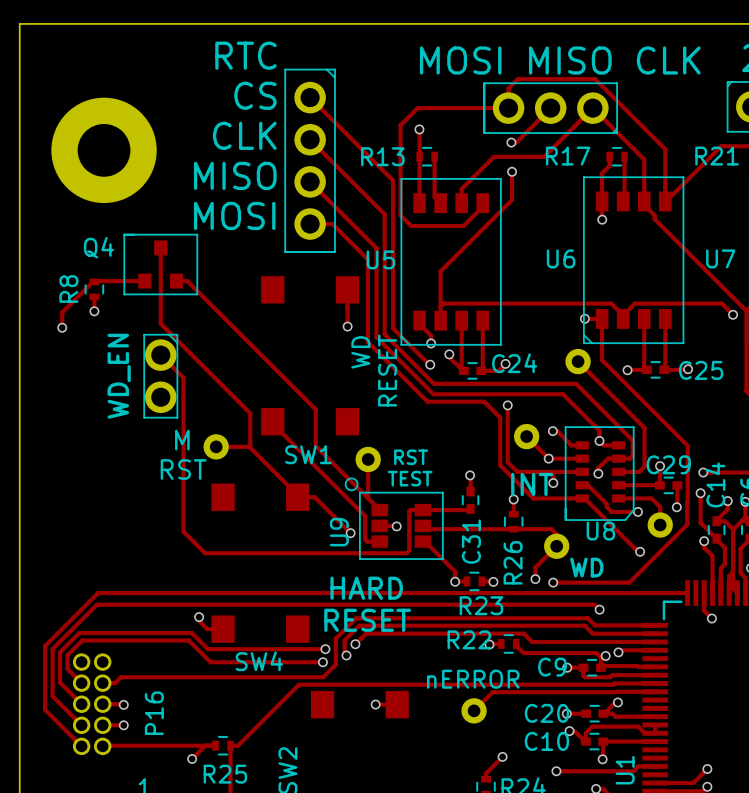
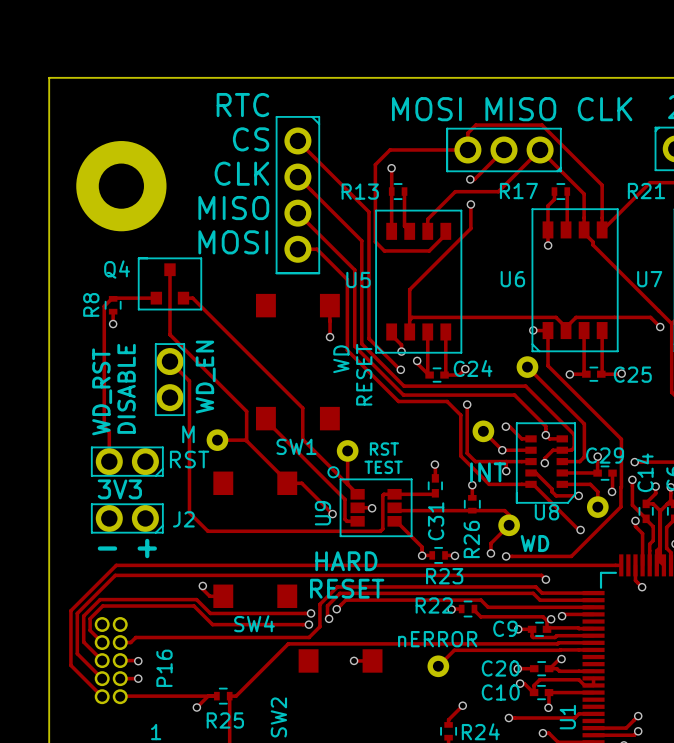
track: (84, 290) (62, 312) (62, 327) -> (104, 306) (104, 426) (109, 431) (109, 461)
via: (62, 327) -> none
text position: WD_EN (119, 376) -> WD_EN (205, 377)
text: none -> DISABLE (126, 388)
text: none -> WD_RST (102, 391)
part: none -> (127, 461)
text: none -> 3V3 (119, 489)
J2: none -> (127, 518)
text: none -> - + (127, 548)

